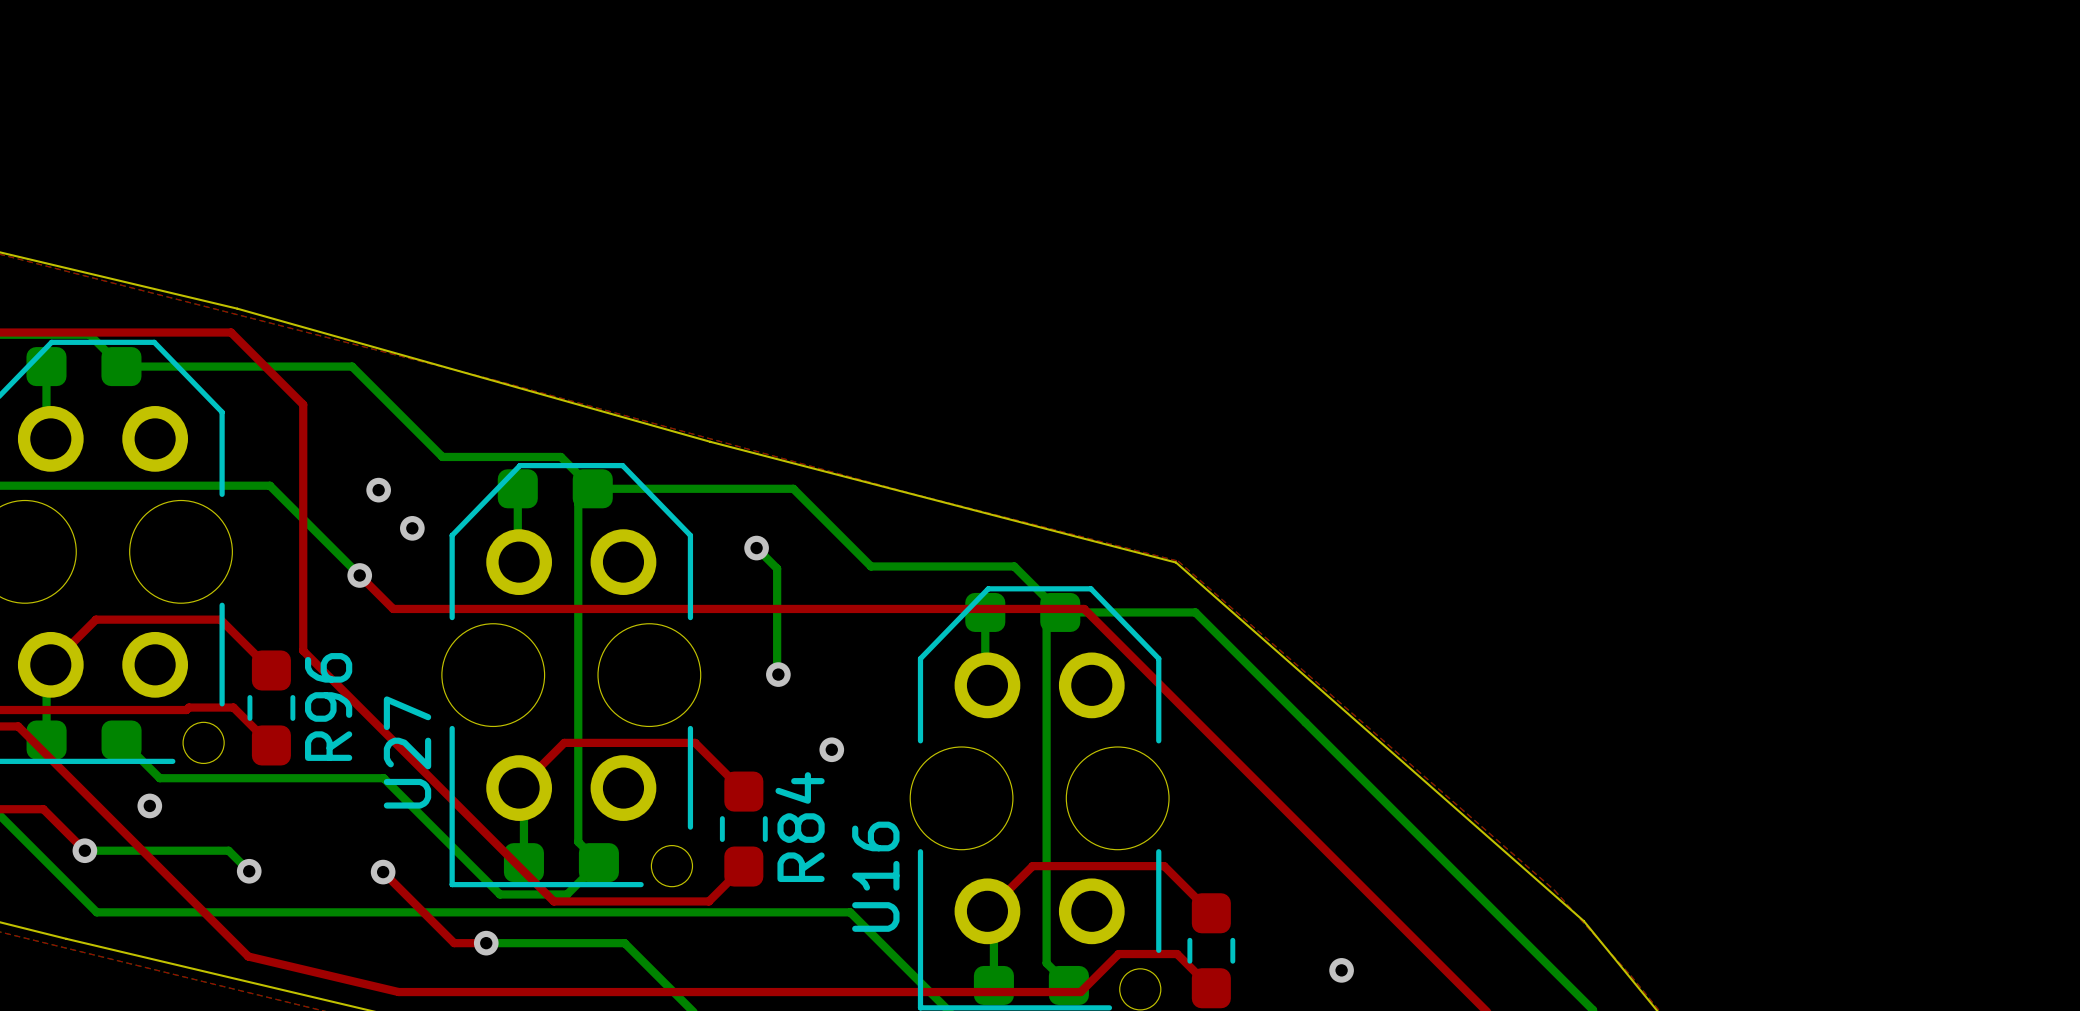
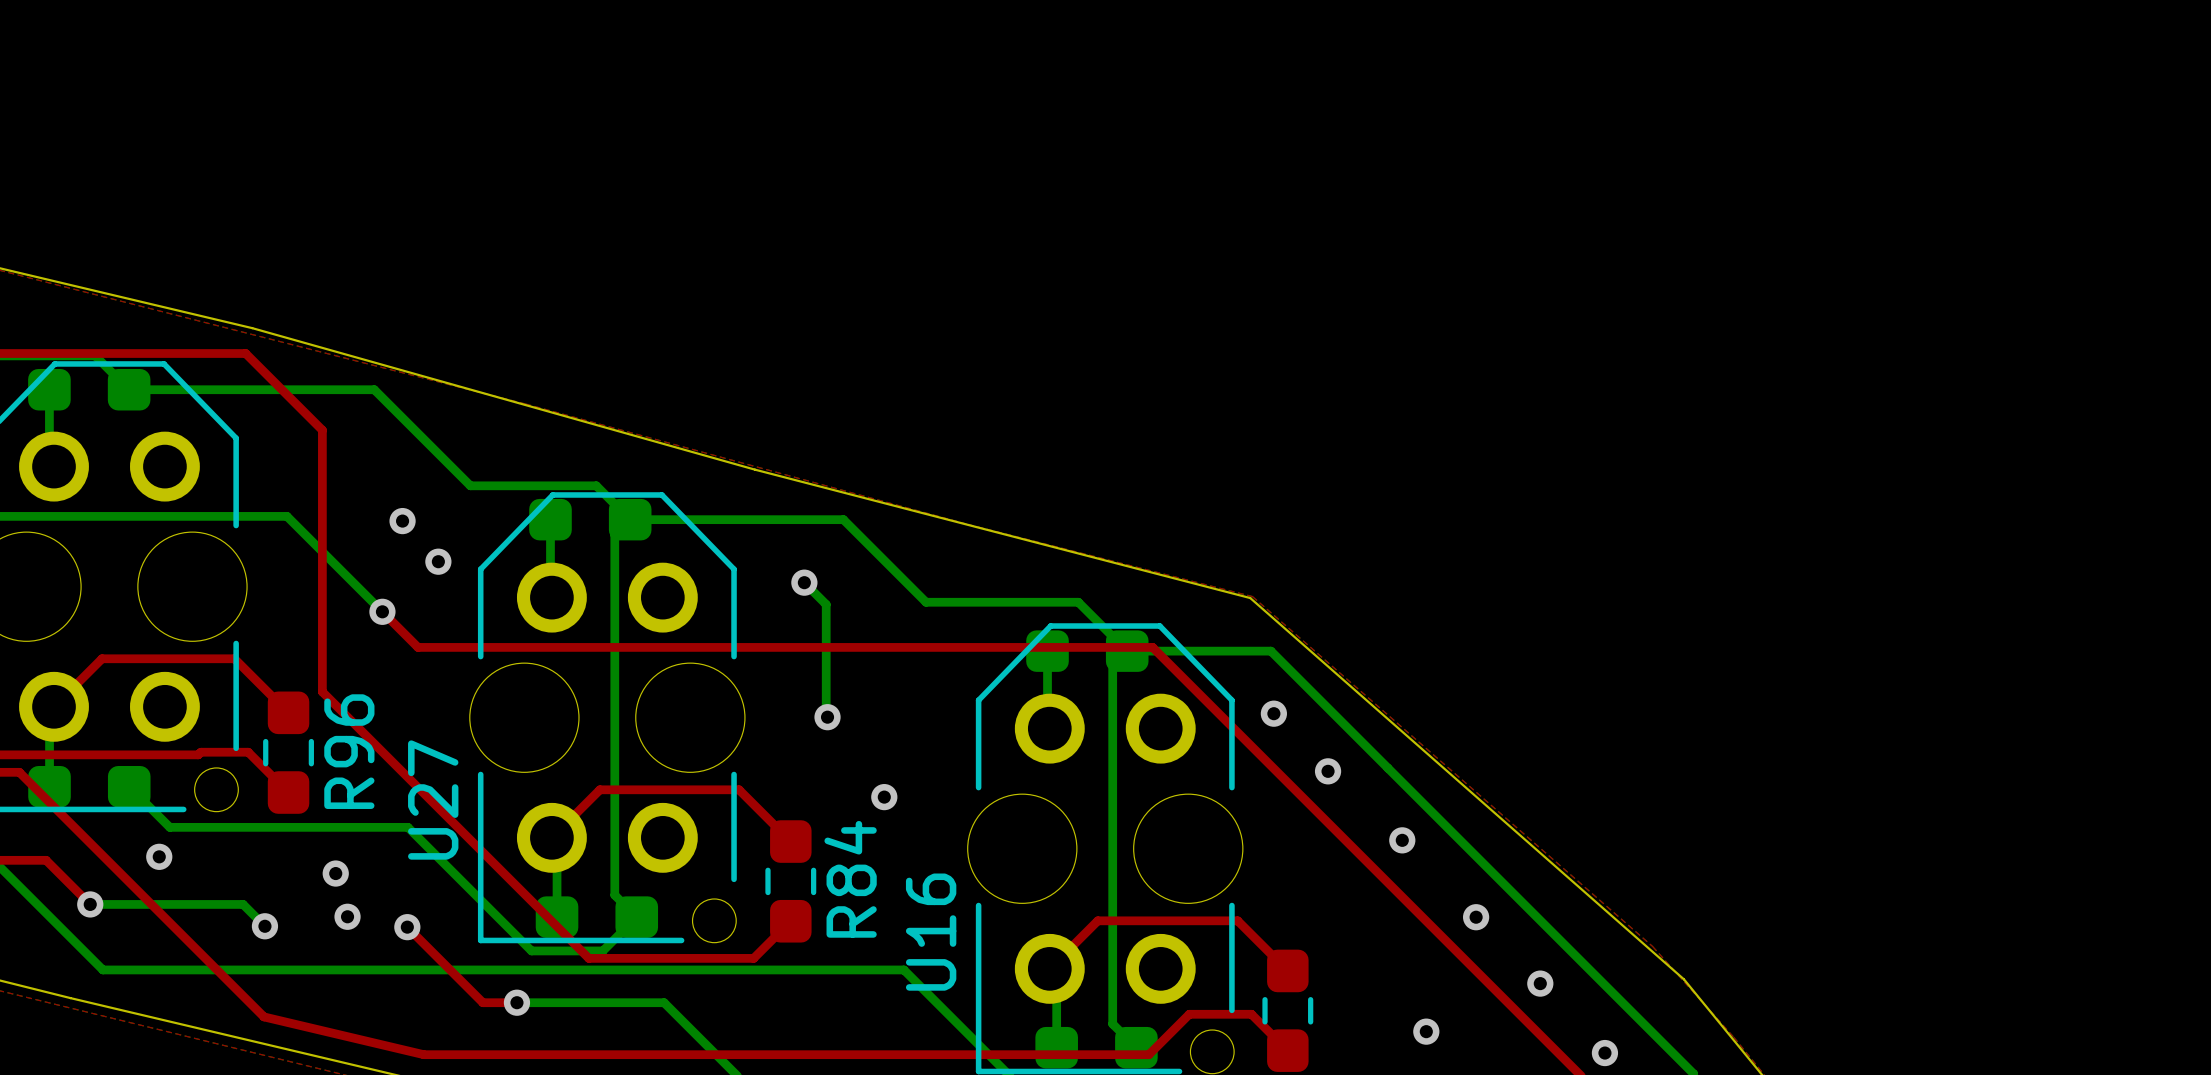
via: none -> (1273, 713)
via: none -> (1328, 771)
via: none -> (1402, 840)
via: none -> (335, 873)
via: none -> (347, 916)
via: none -> (1476, 917)
via: none -> (1540, 983)
via: none -> (1604, 1053)

